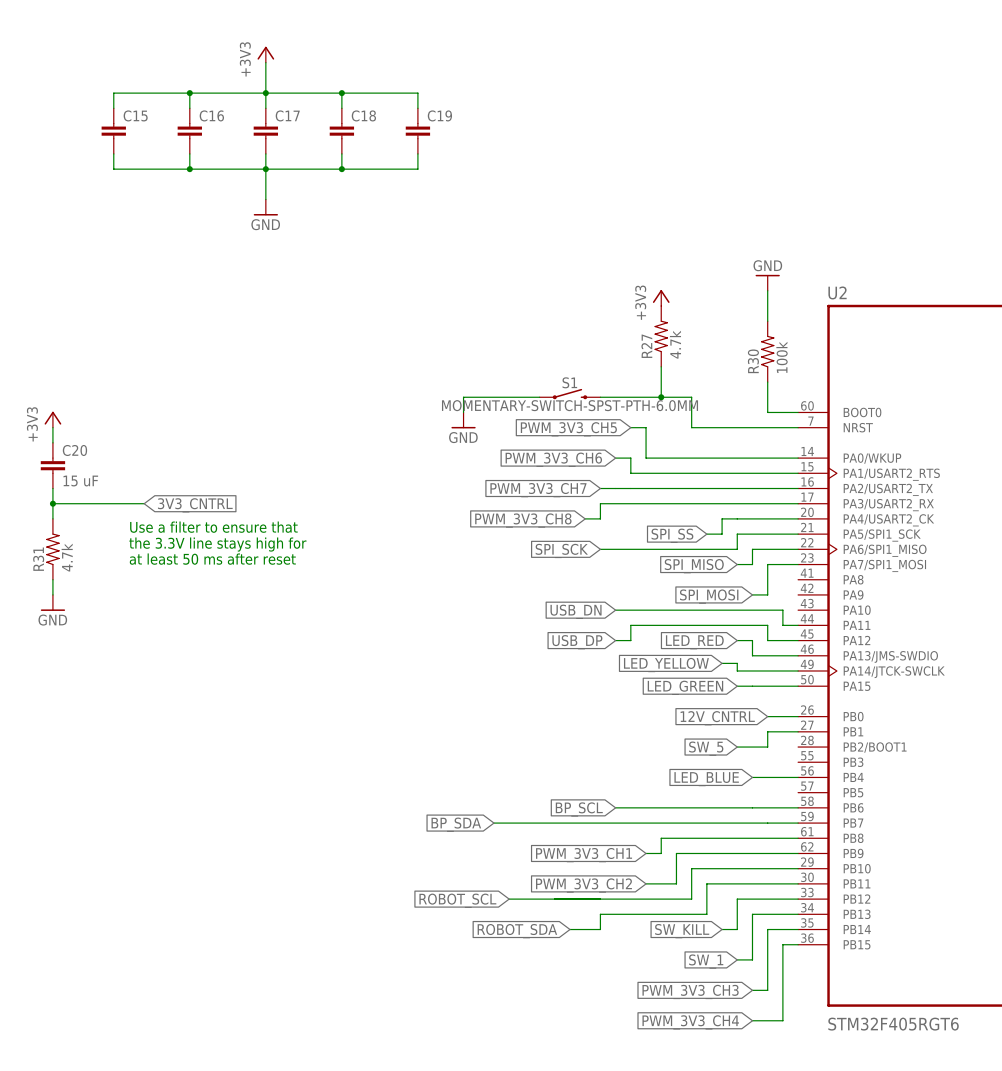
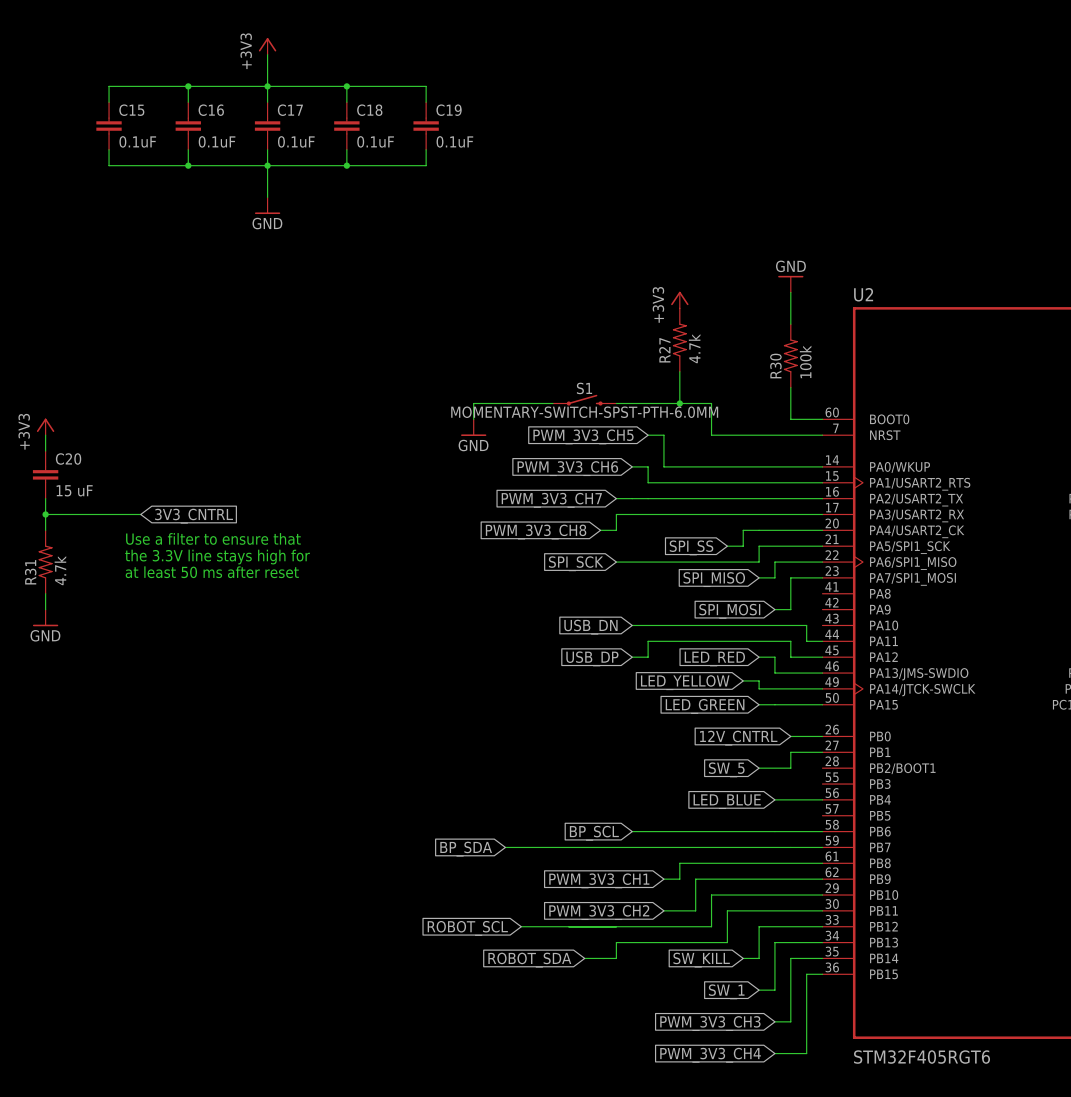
C15 value: none -> 0.1uF (137, 141)
C16 value: none -> 0.1uF (217, 141)
C17 value: none -> 0.1uF (296, 141)
C18 value: none -> 0.1uF (375, 141)
C19 value: none -> 0.1uF (454, 141)

